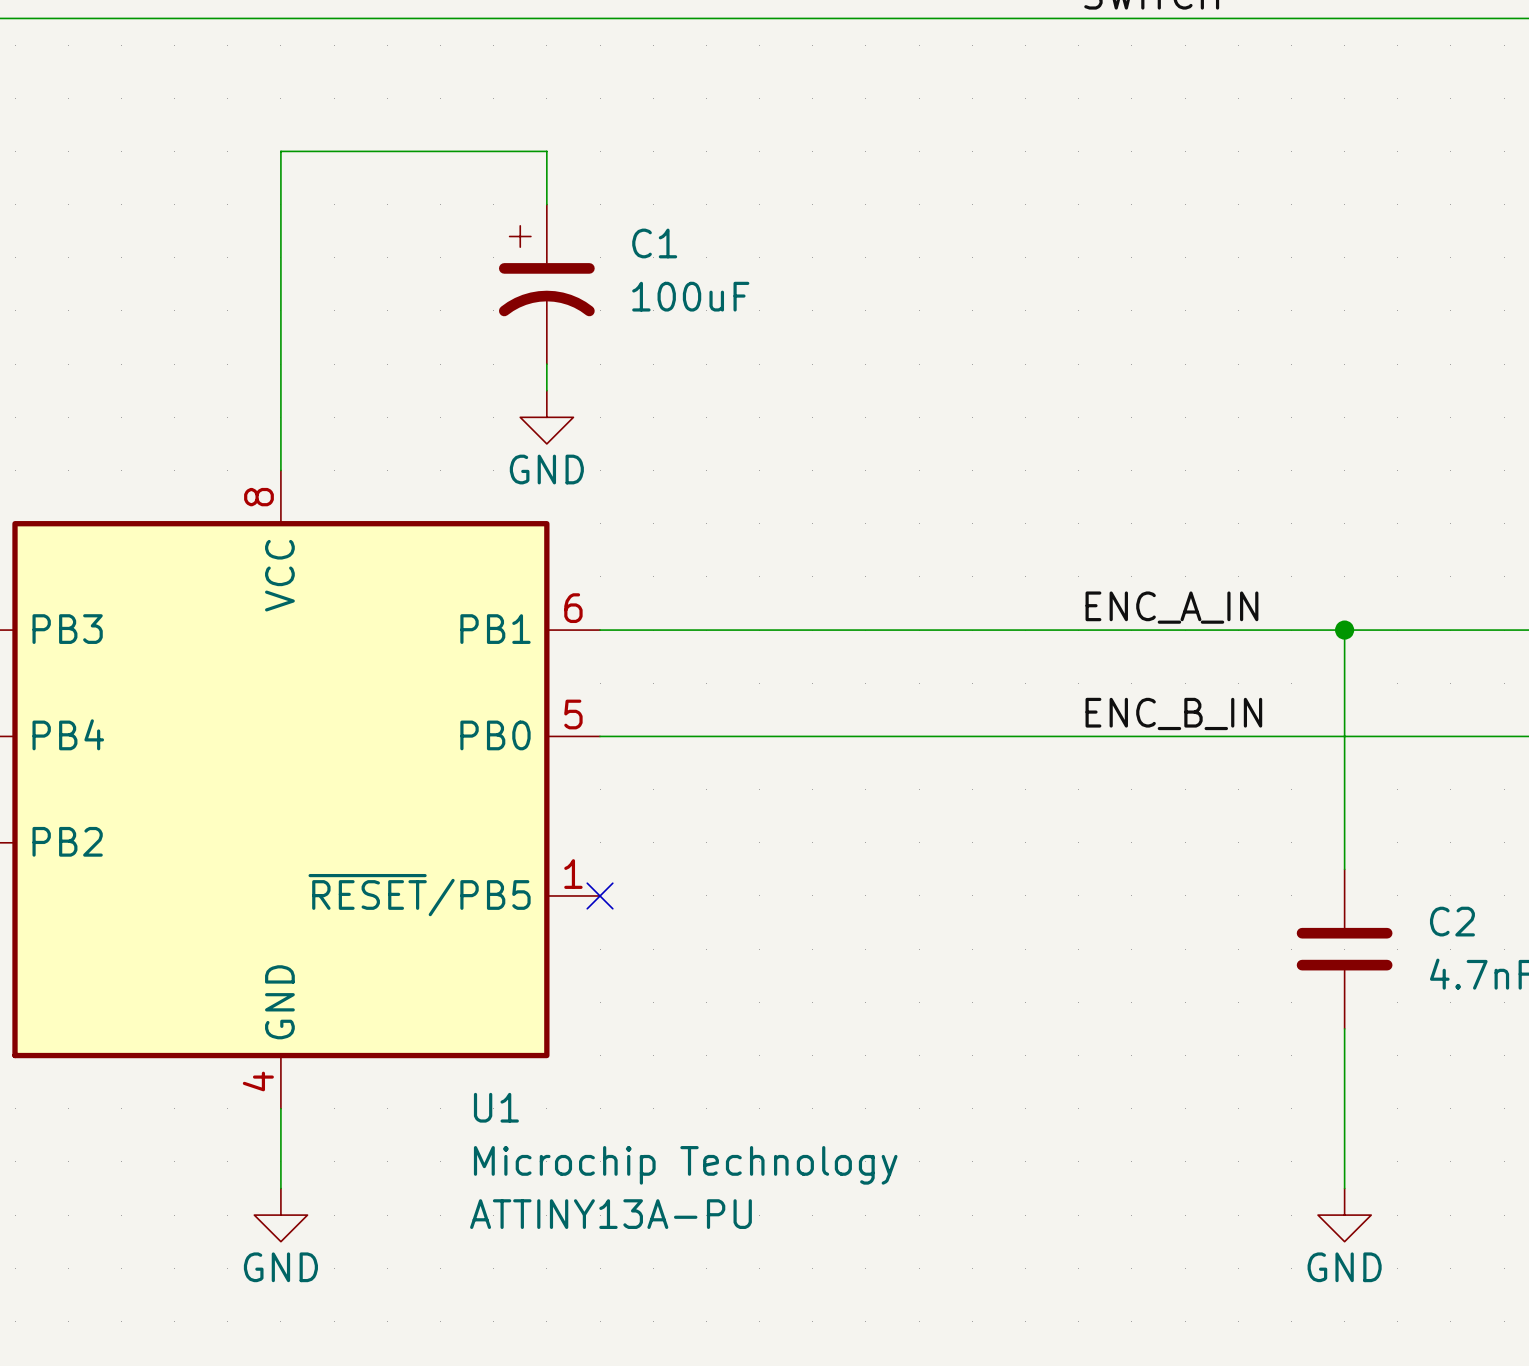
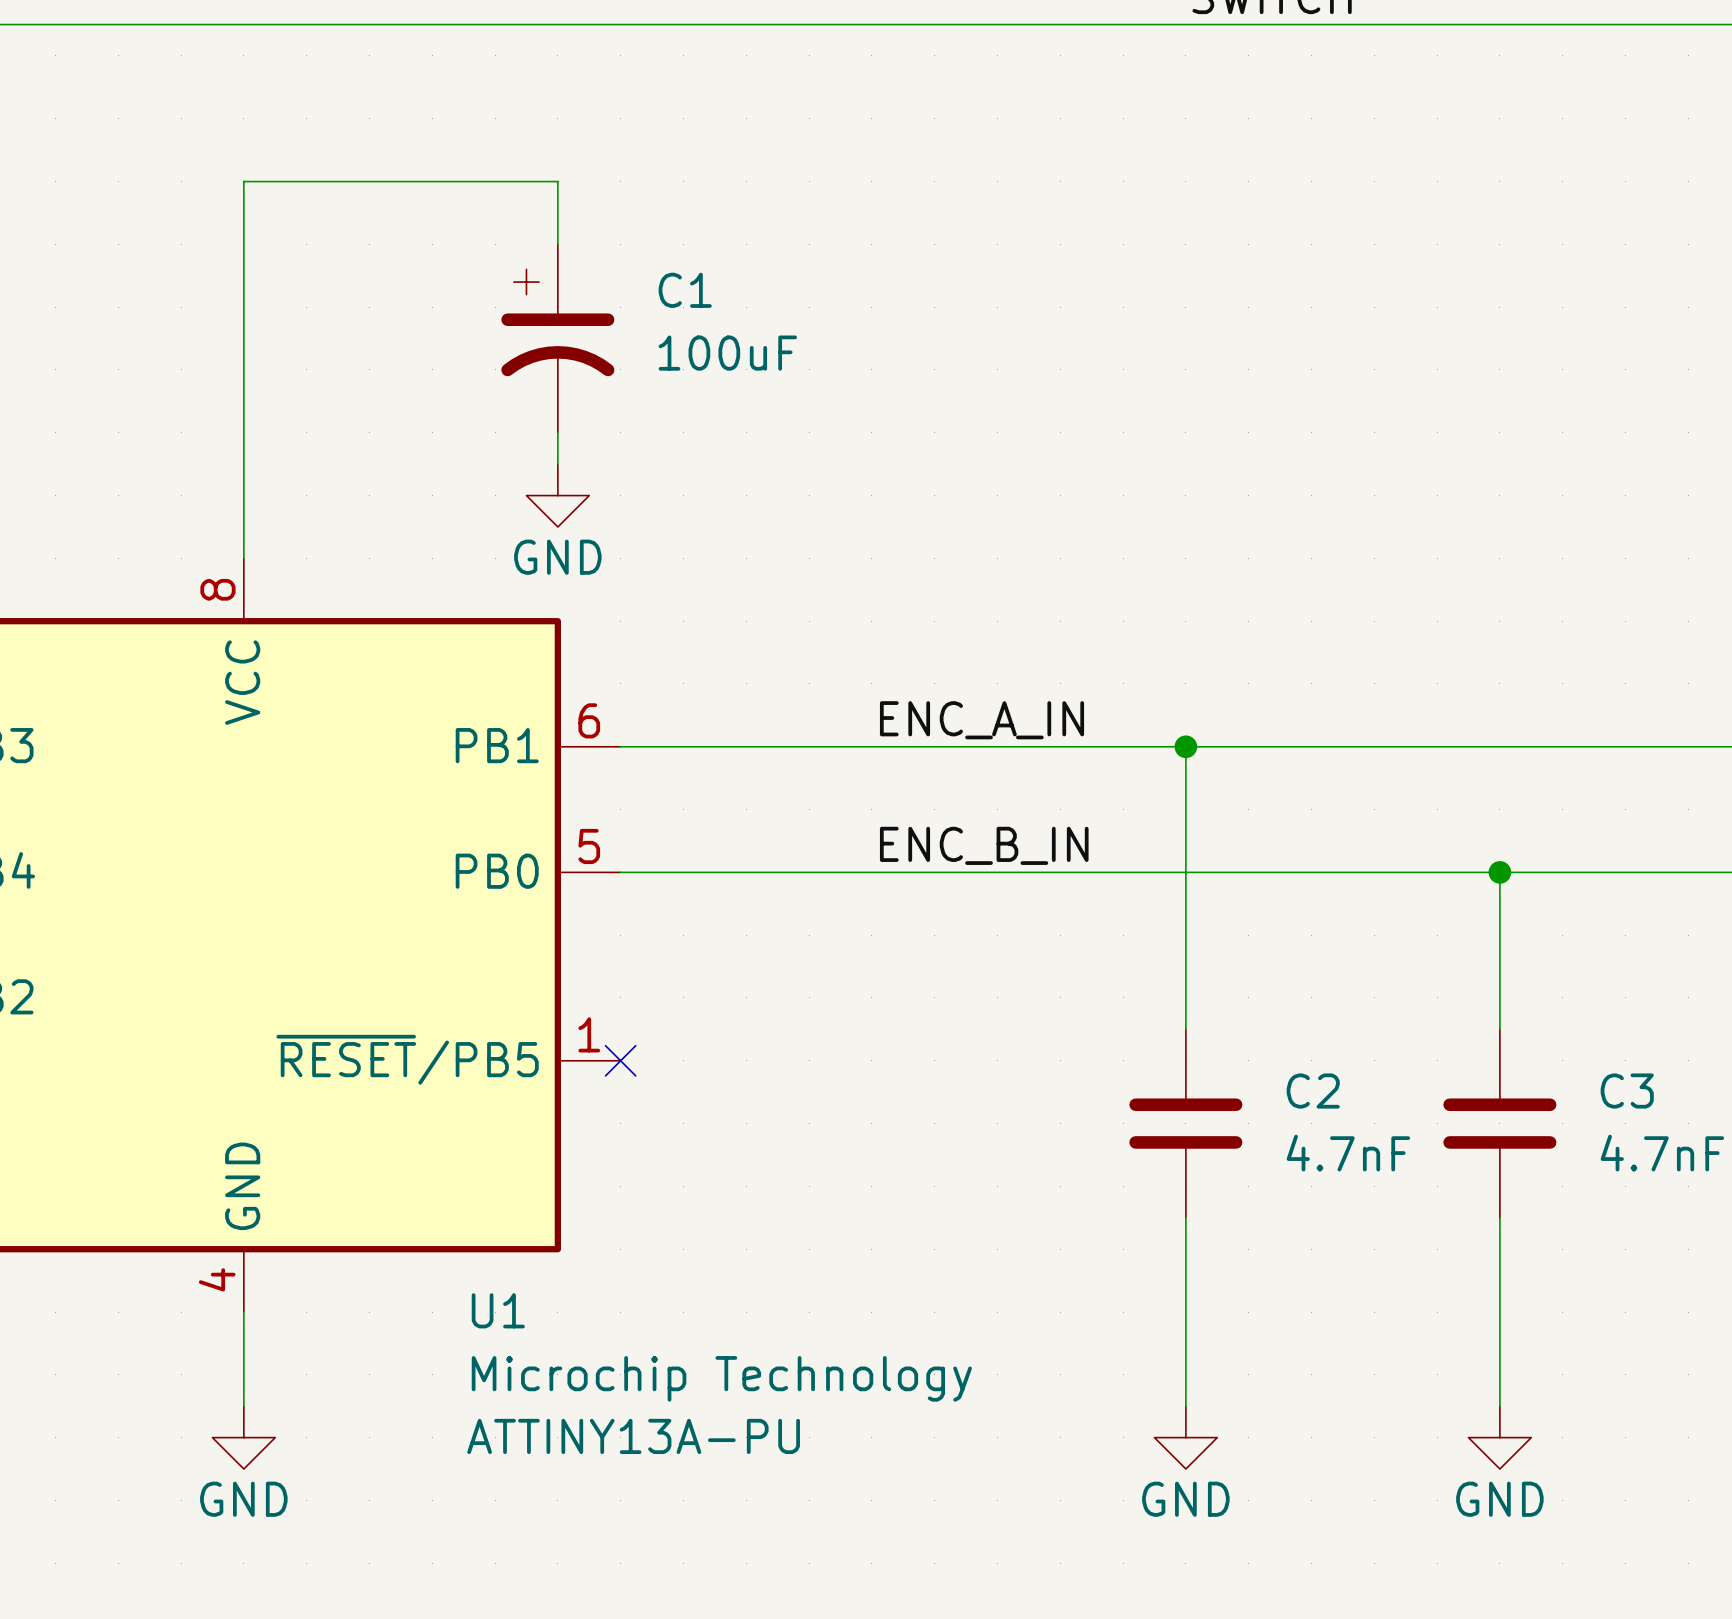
label position: ENC_A_IN (1171, 607) -> ENC_A_IN (982, 720)
wire: none -> (1185, 746) (1185, 1029)
junction: none -> (1185, 746)
wire: (1344, 630) (1344, 736) -> none
junction position: (1344, 630) -> (1499, 872)
label position: ENC_B_IN (1173, 713) -> ENC_B_IN (984, 845)
C2 name: C2 (1452, 921) -> C3 (1627, 1091)
C2: none -> 4.7nF (1185, 1123)
wire: none -> (1185, 1217) (1185, 1406)
power symbol: none -> GND (1185, 1437)

